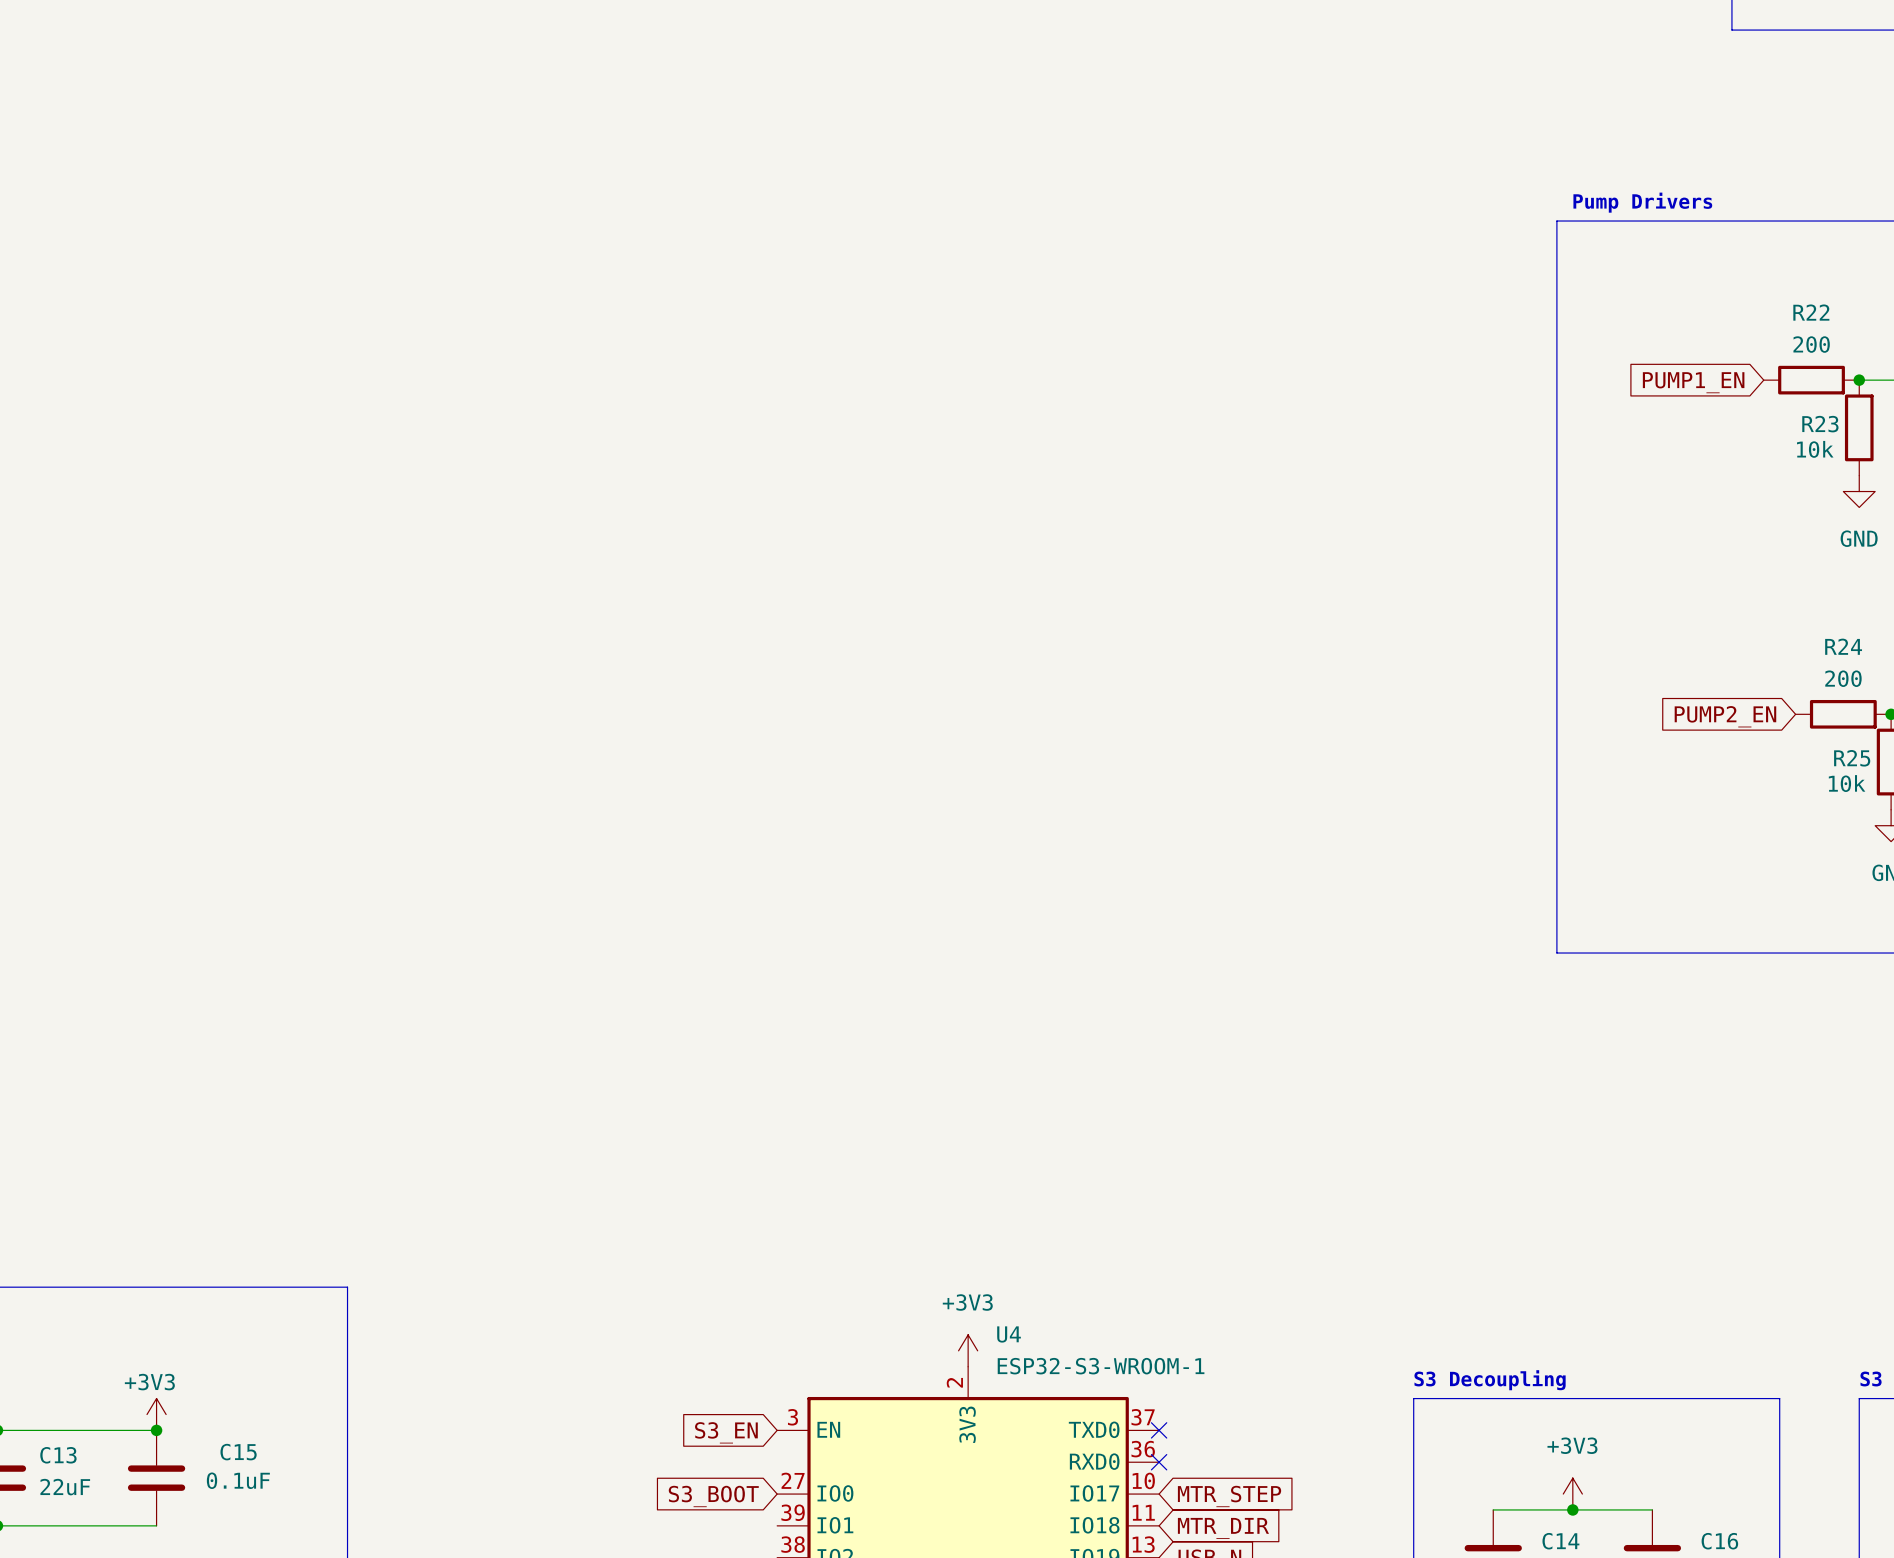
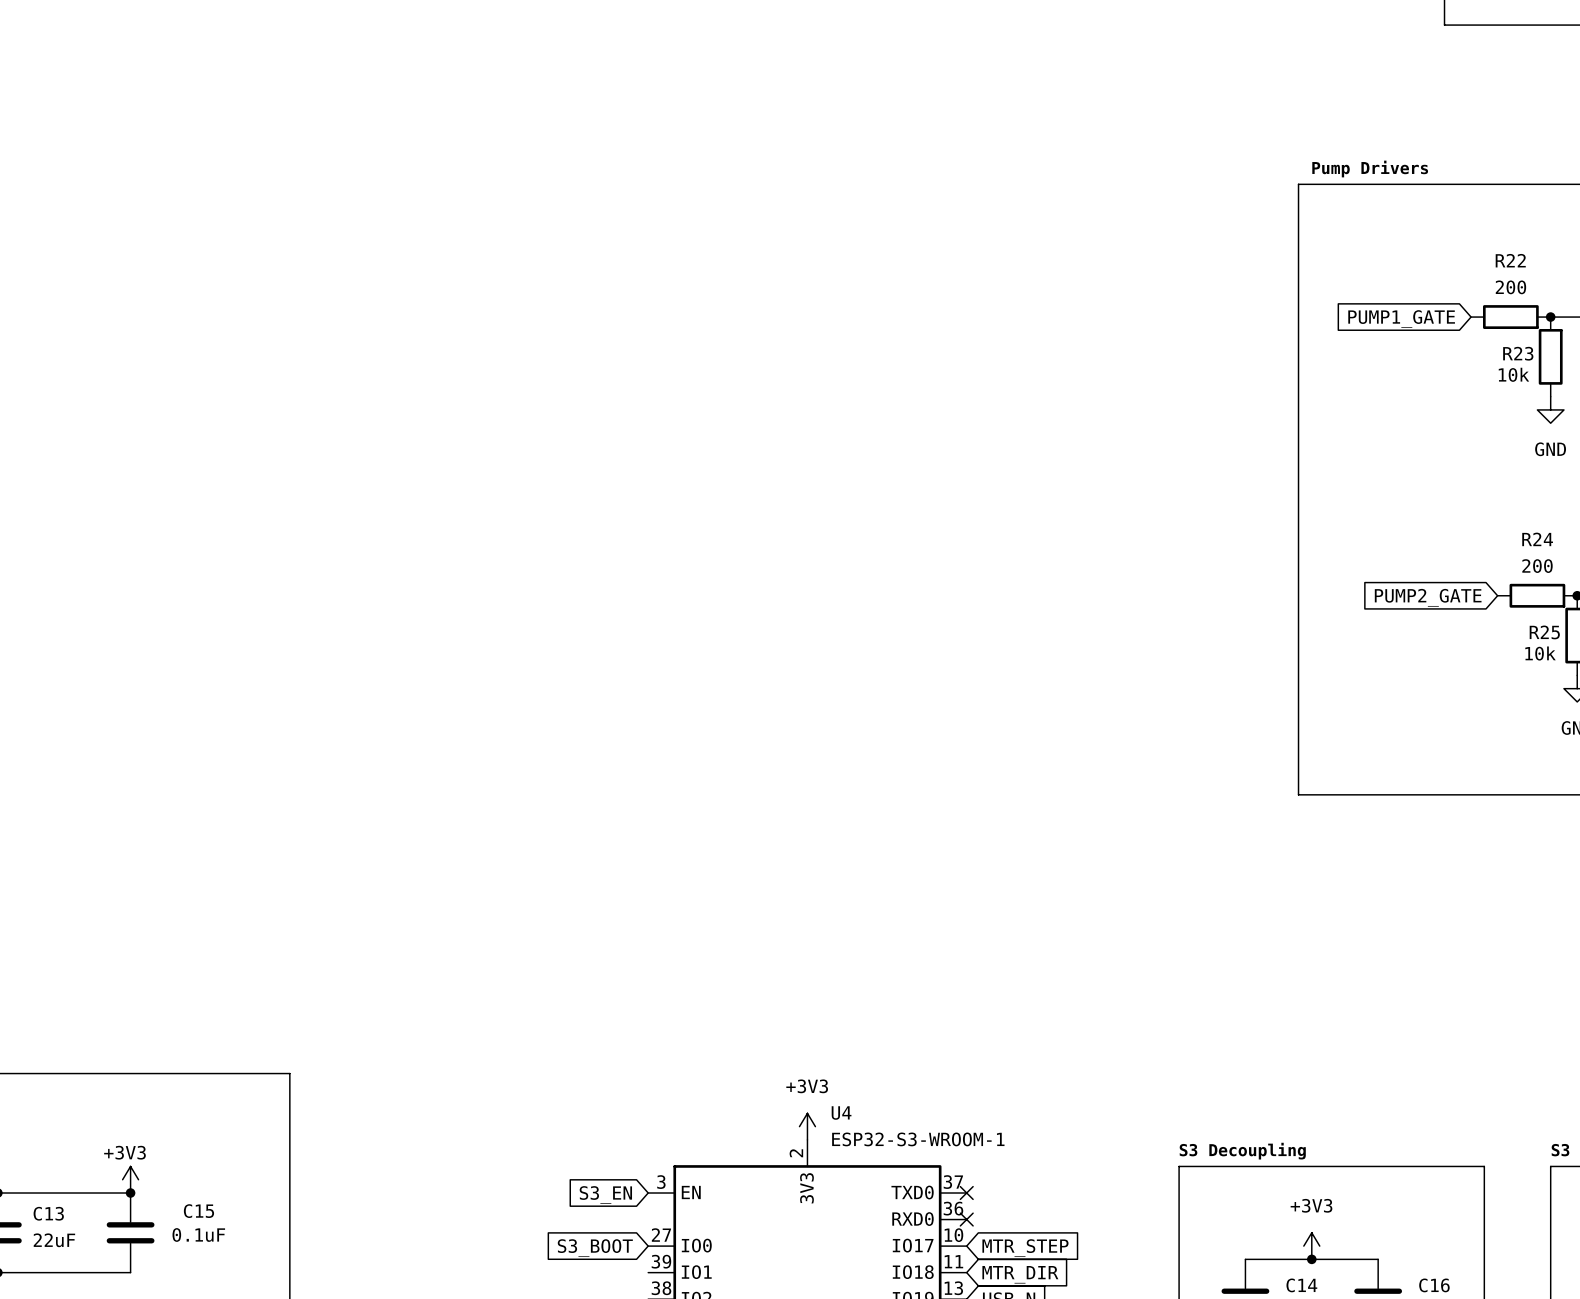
global label: PUMP1_EN (1693, 382) -> PUMP1_GATE (1401, 319)
global label: PUMP2_EN (1725, 716) -> PUMP2_GATE (1428, 597)

